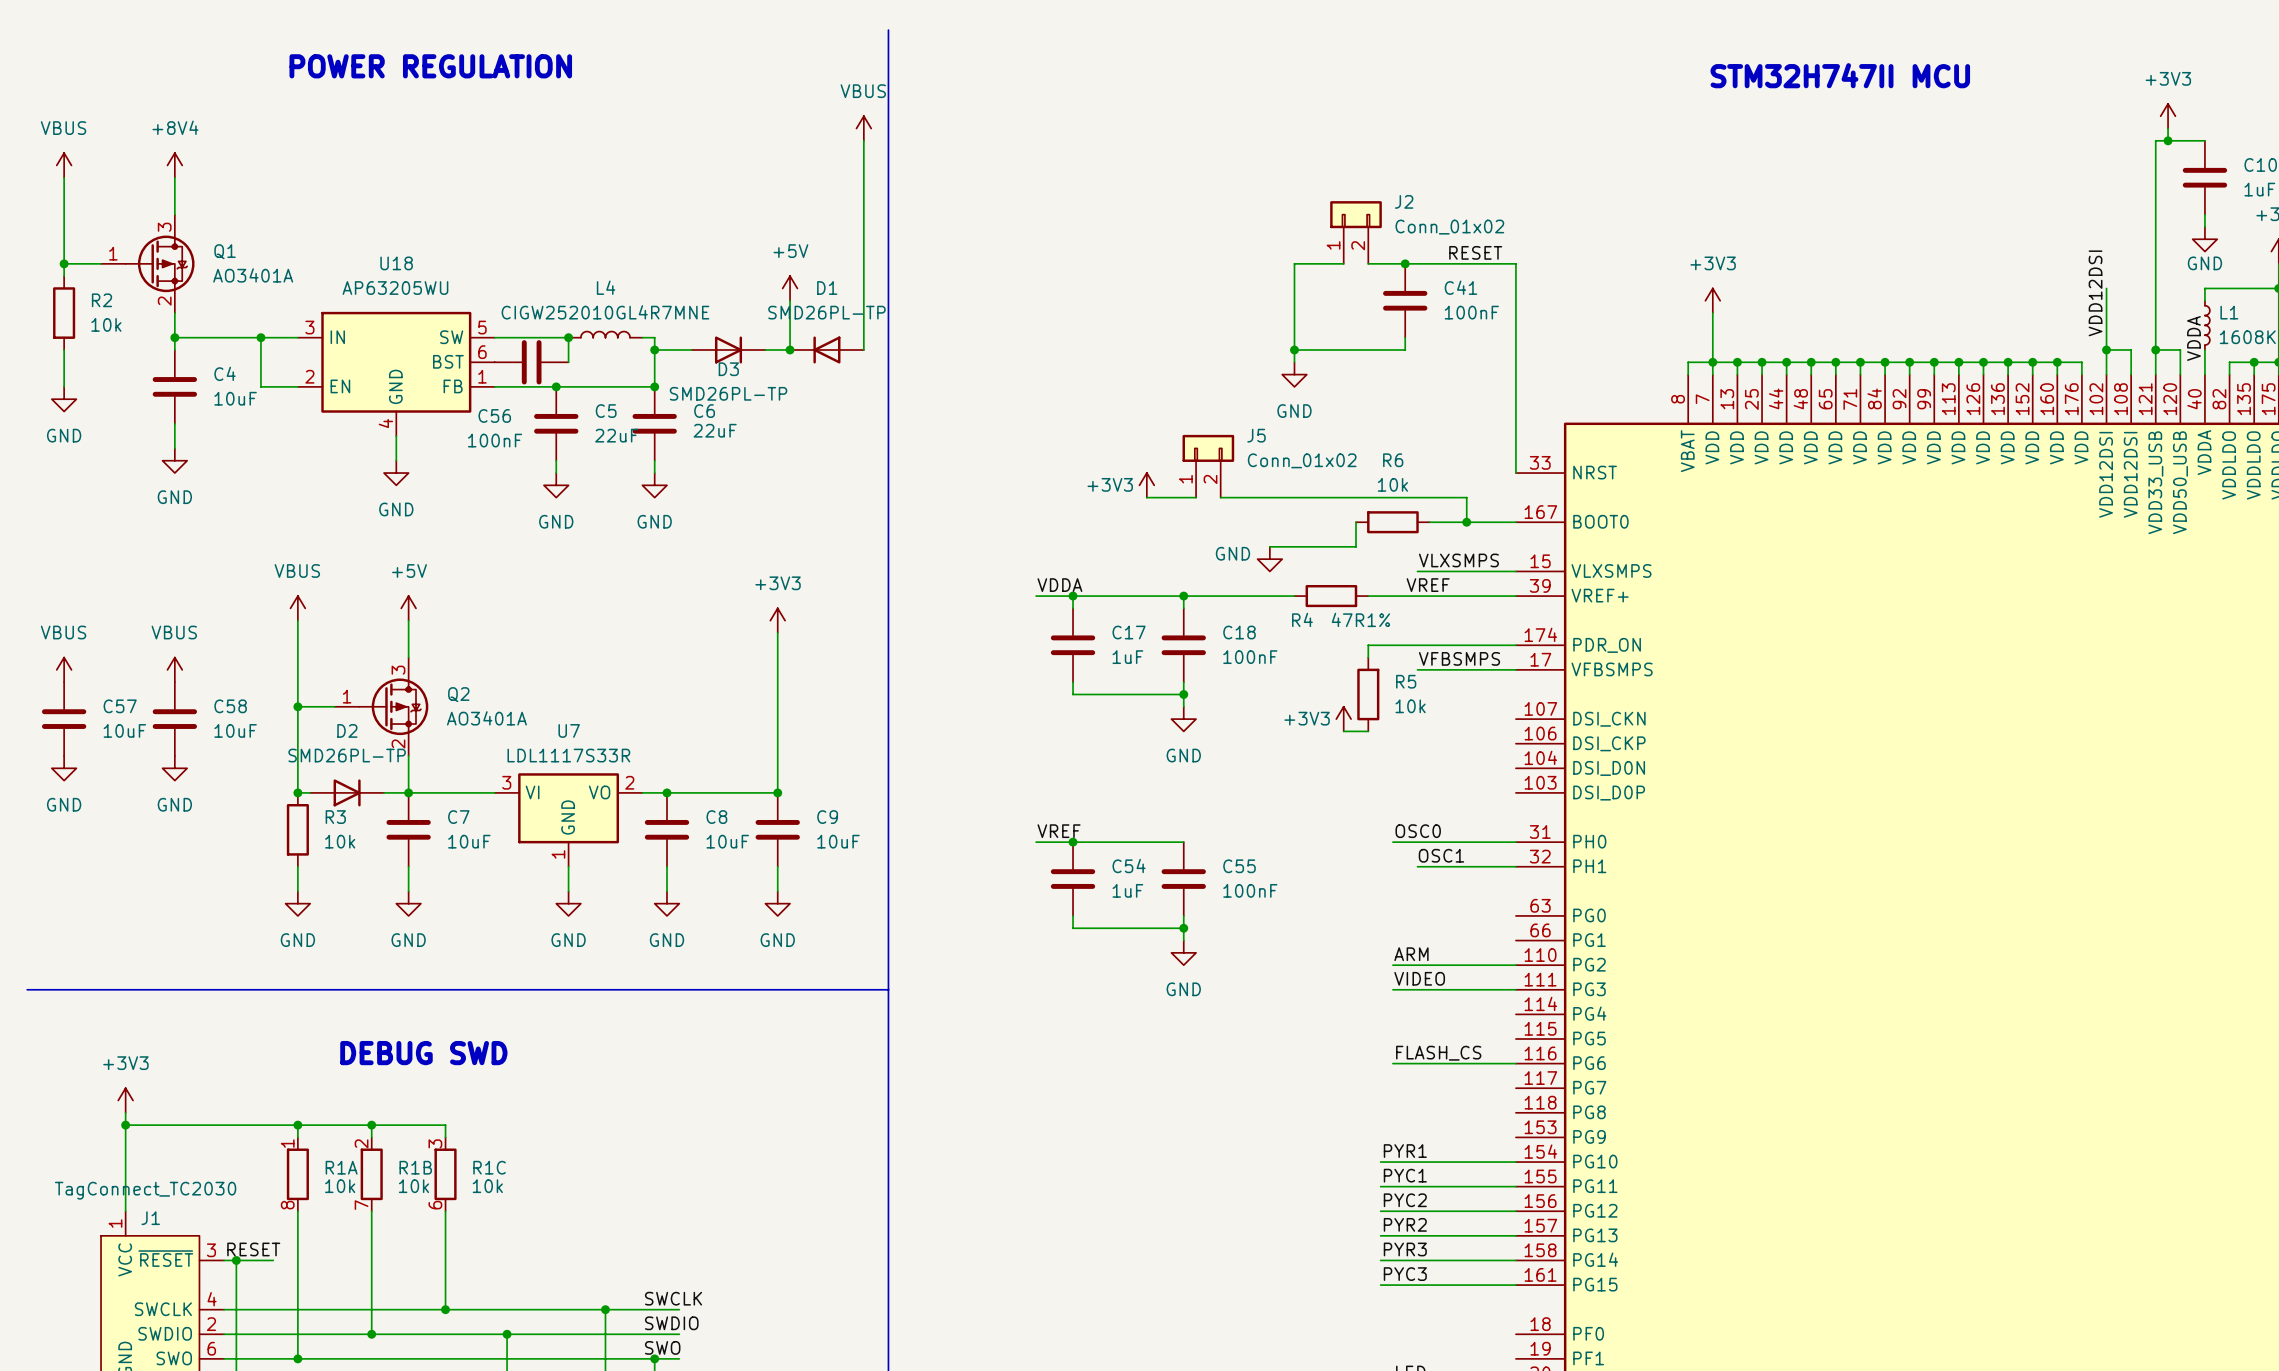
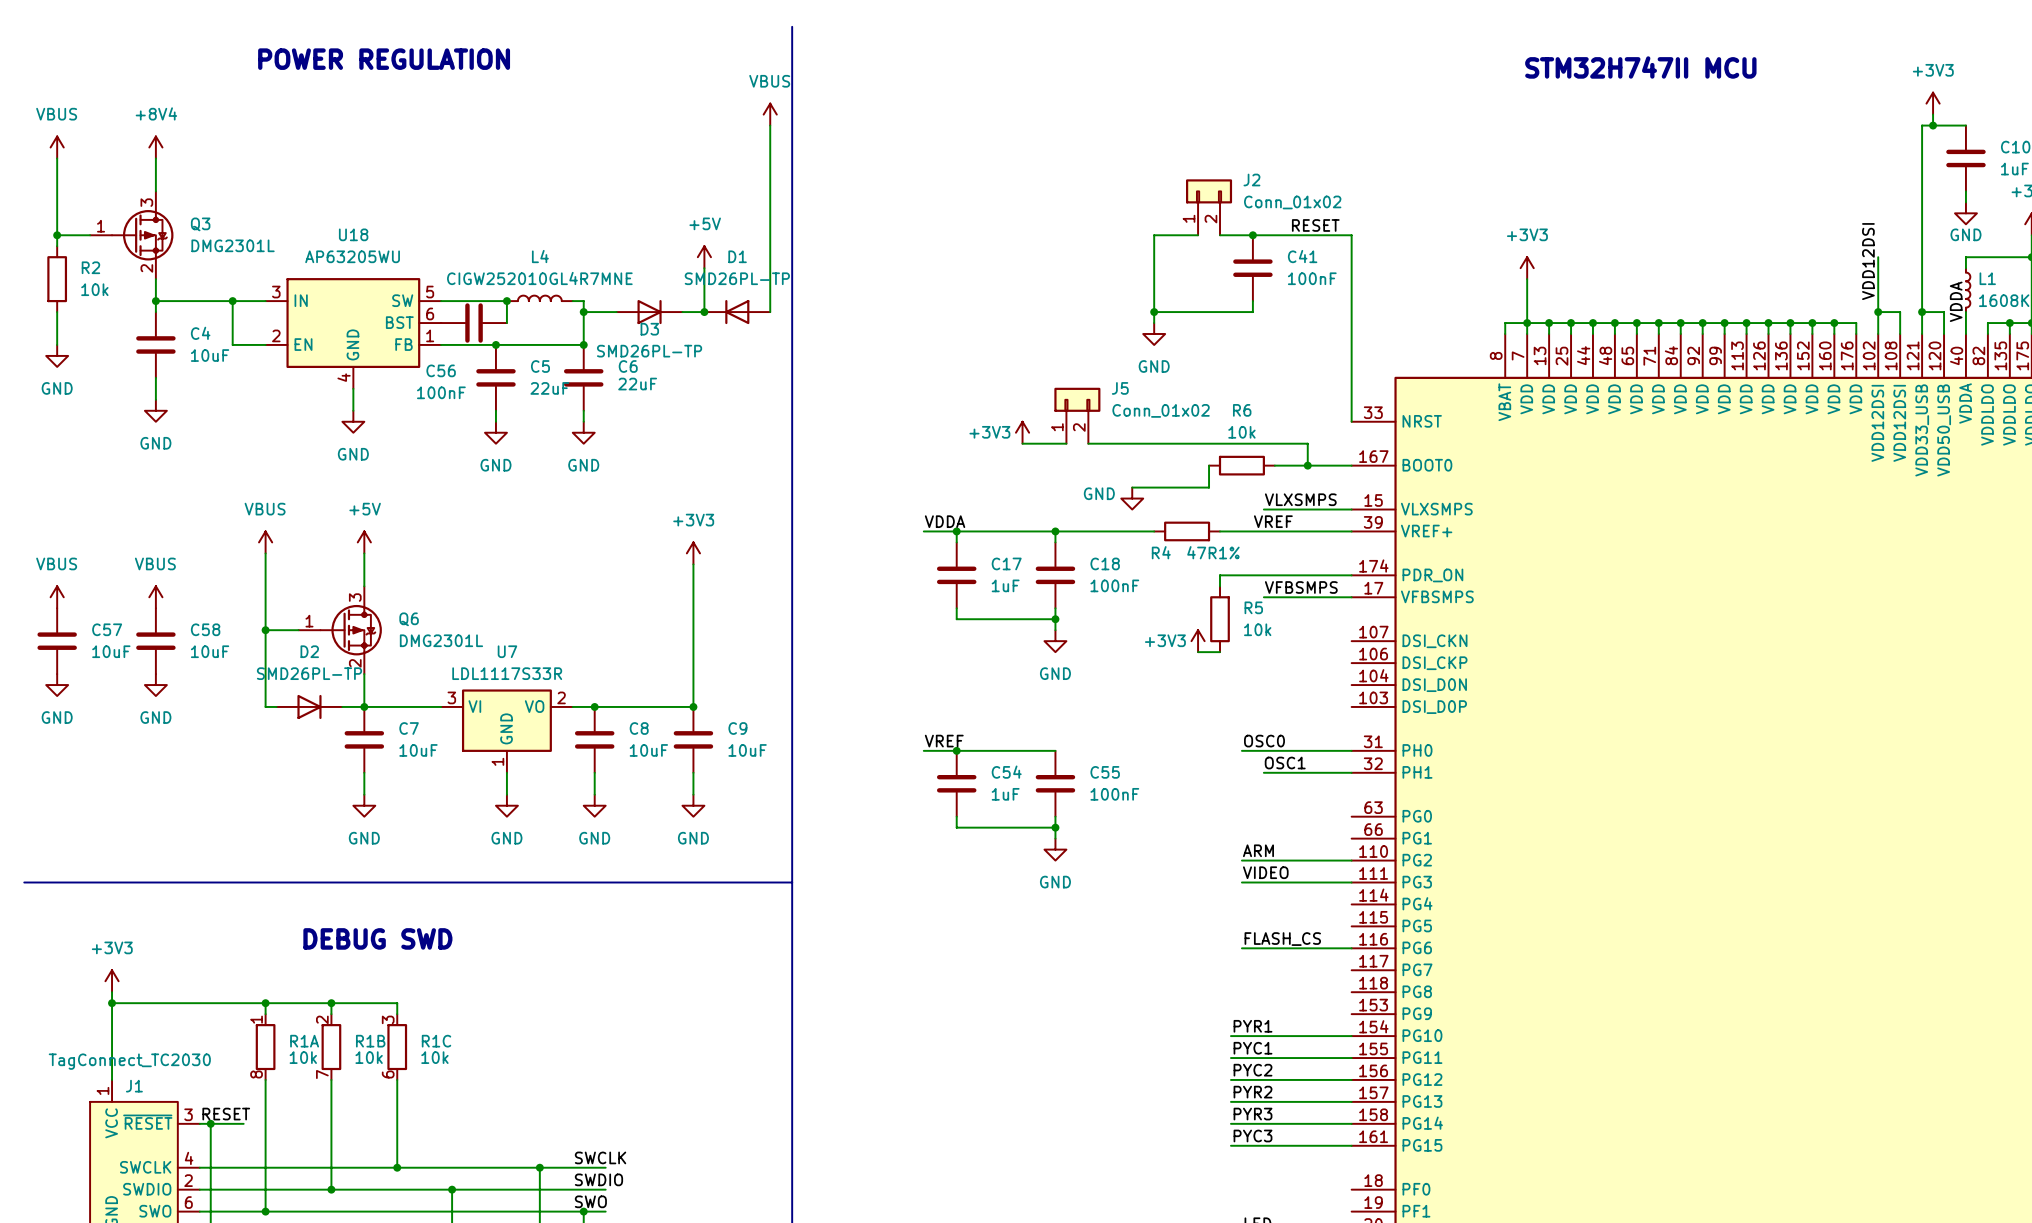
Q1 name: Q1 (225, 251) -> Q3 (200, 224)
Q1 value: AO3401A (253, 275) -> DMG2301L (233, 245)
Q2 name: Q2 (458, 694) -> Q6 (409, 619)
Q2 value: AO3401A (486, 718) -> DMG2301L (441, 640)
junction: (297, 792) -> none
R3: 10k (297, 829) -> none
wire: (297, 866) (297, 891) -> none
power symbol: GND (297, 903) -> none

